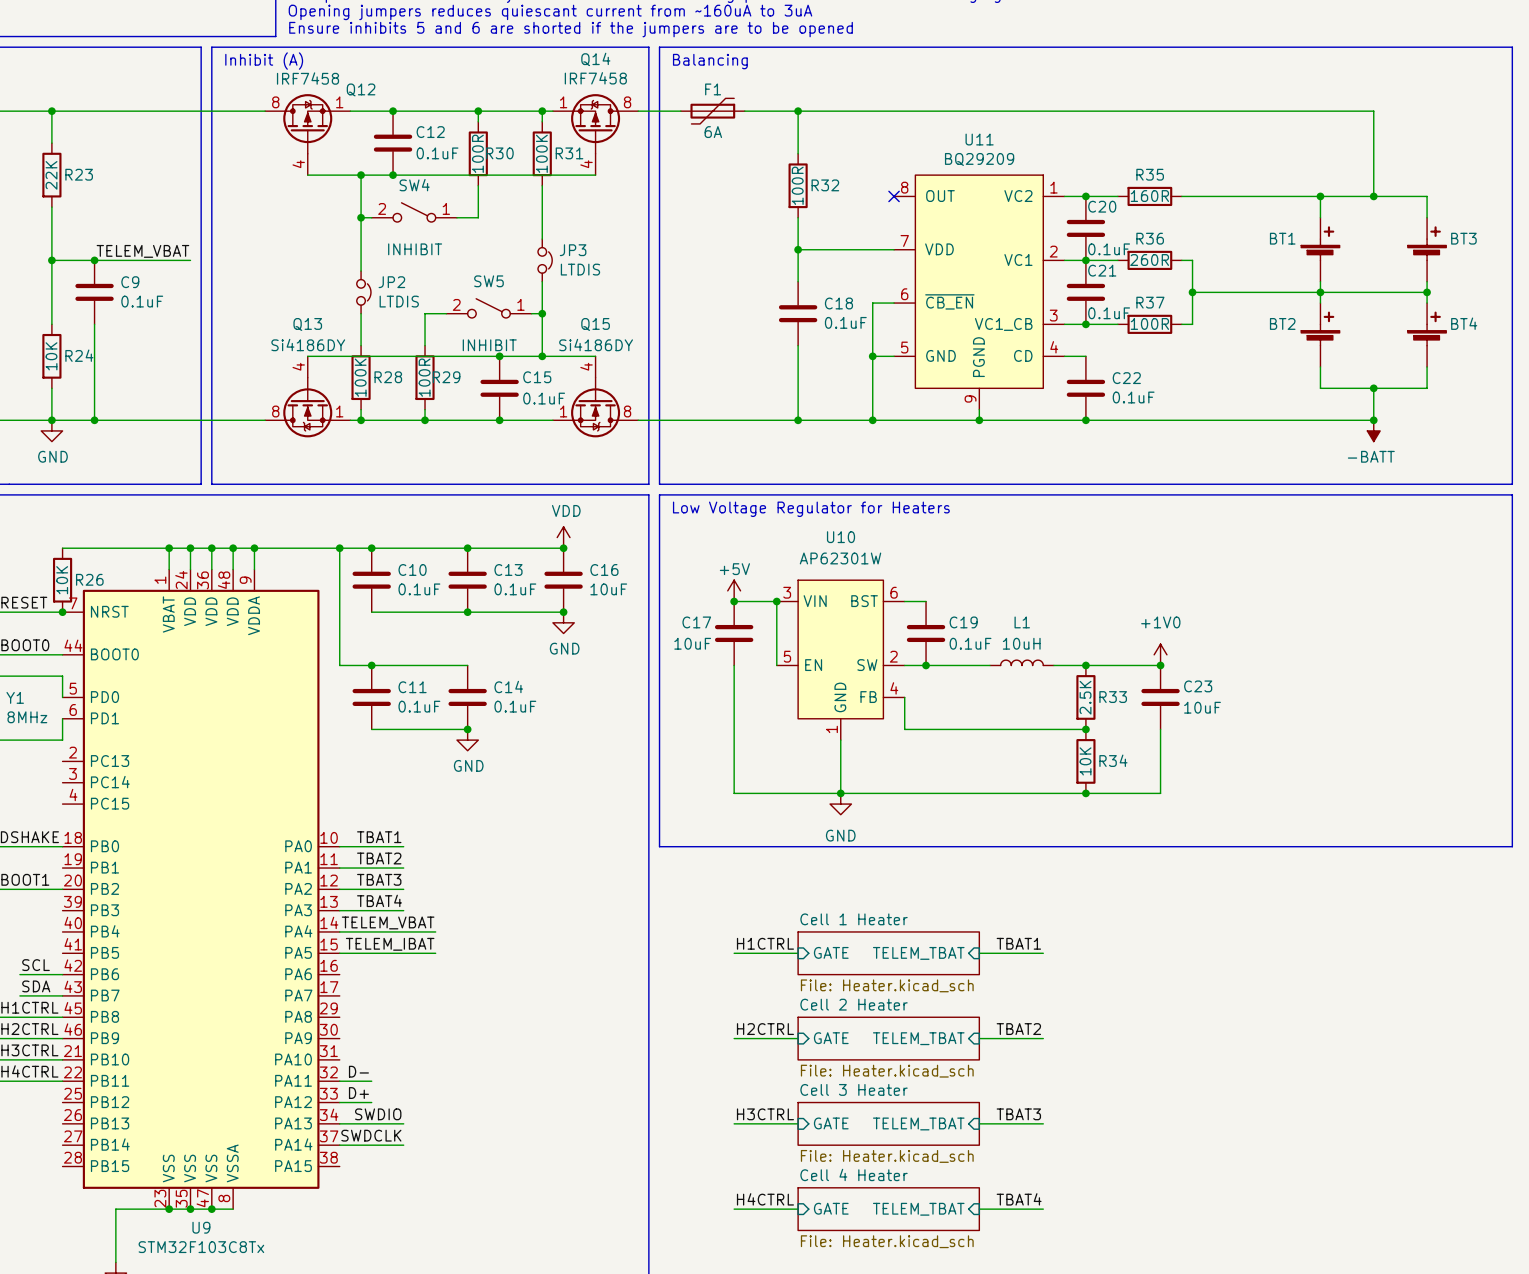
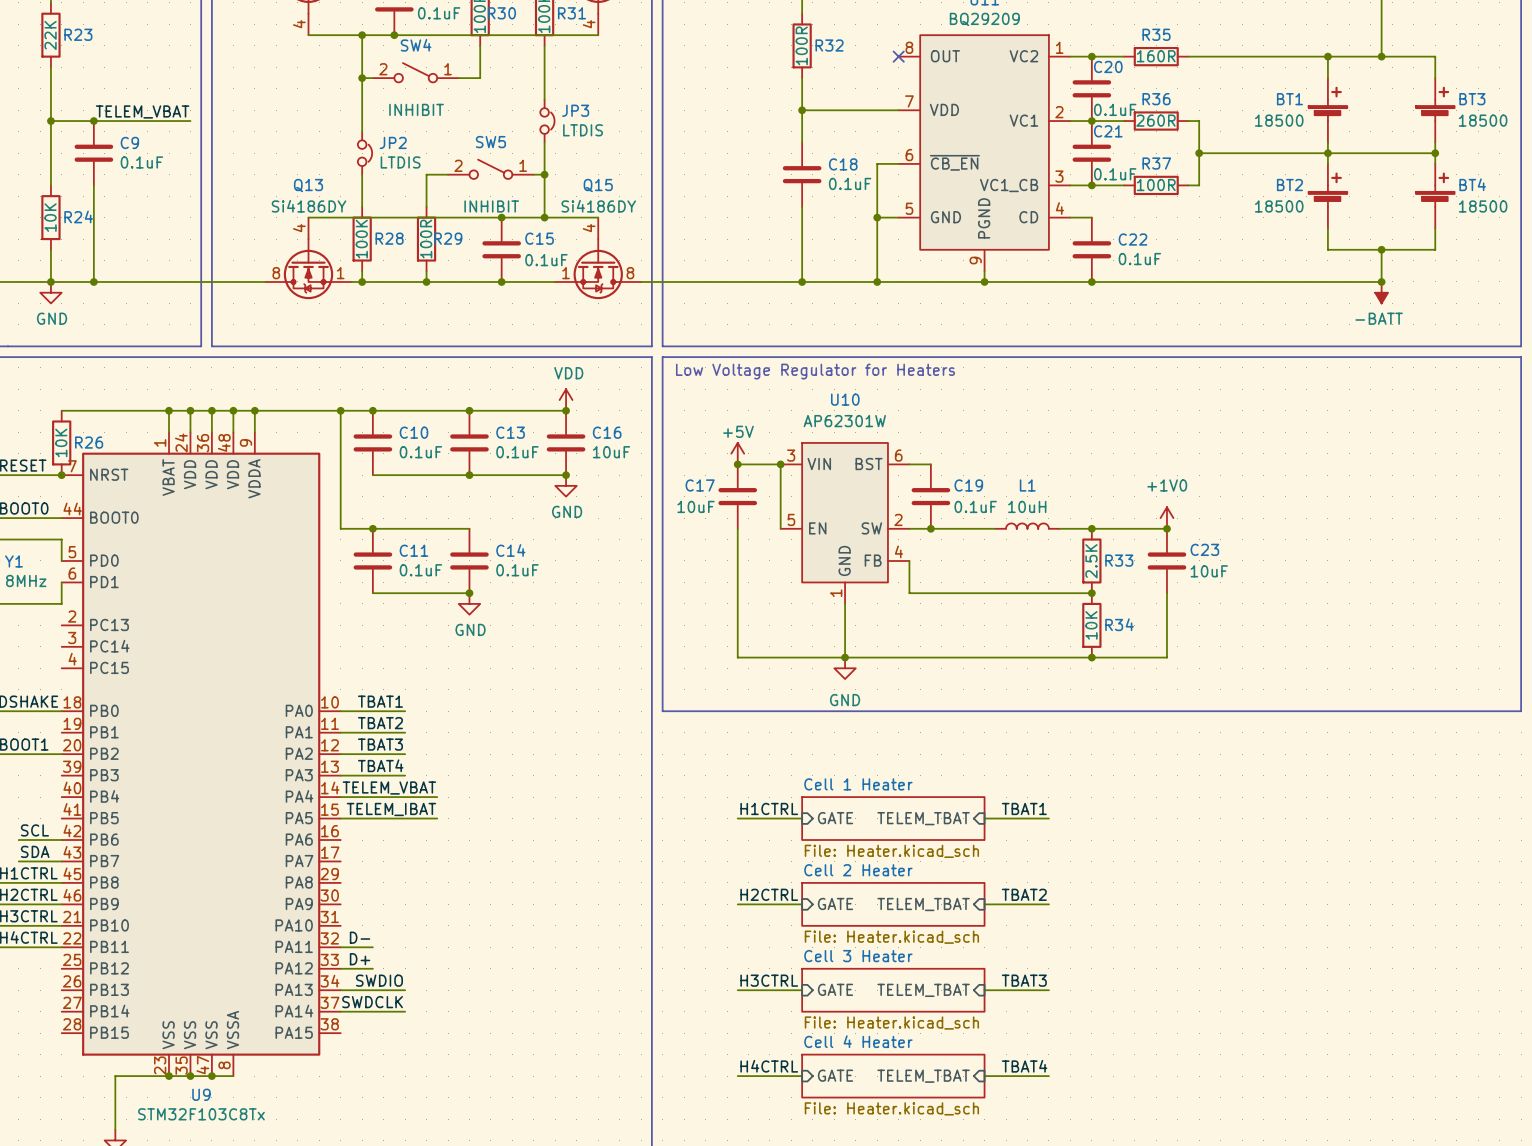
BT1 value: none -> 18500 (1279, 120)
BT3 value: none -> 18500 (1483, 120)
BT2 value: none -> 18500 (1279, 206)
BT4 value: none -> 18500 (1483, 206)

